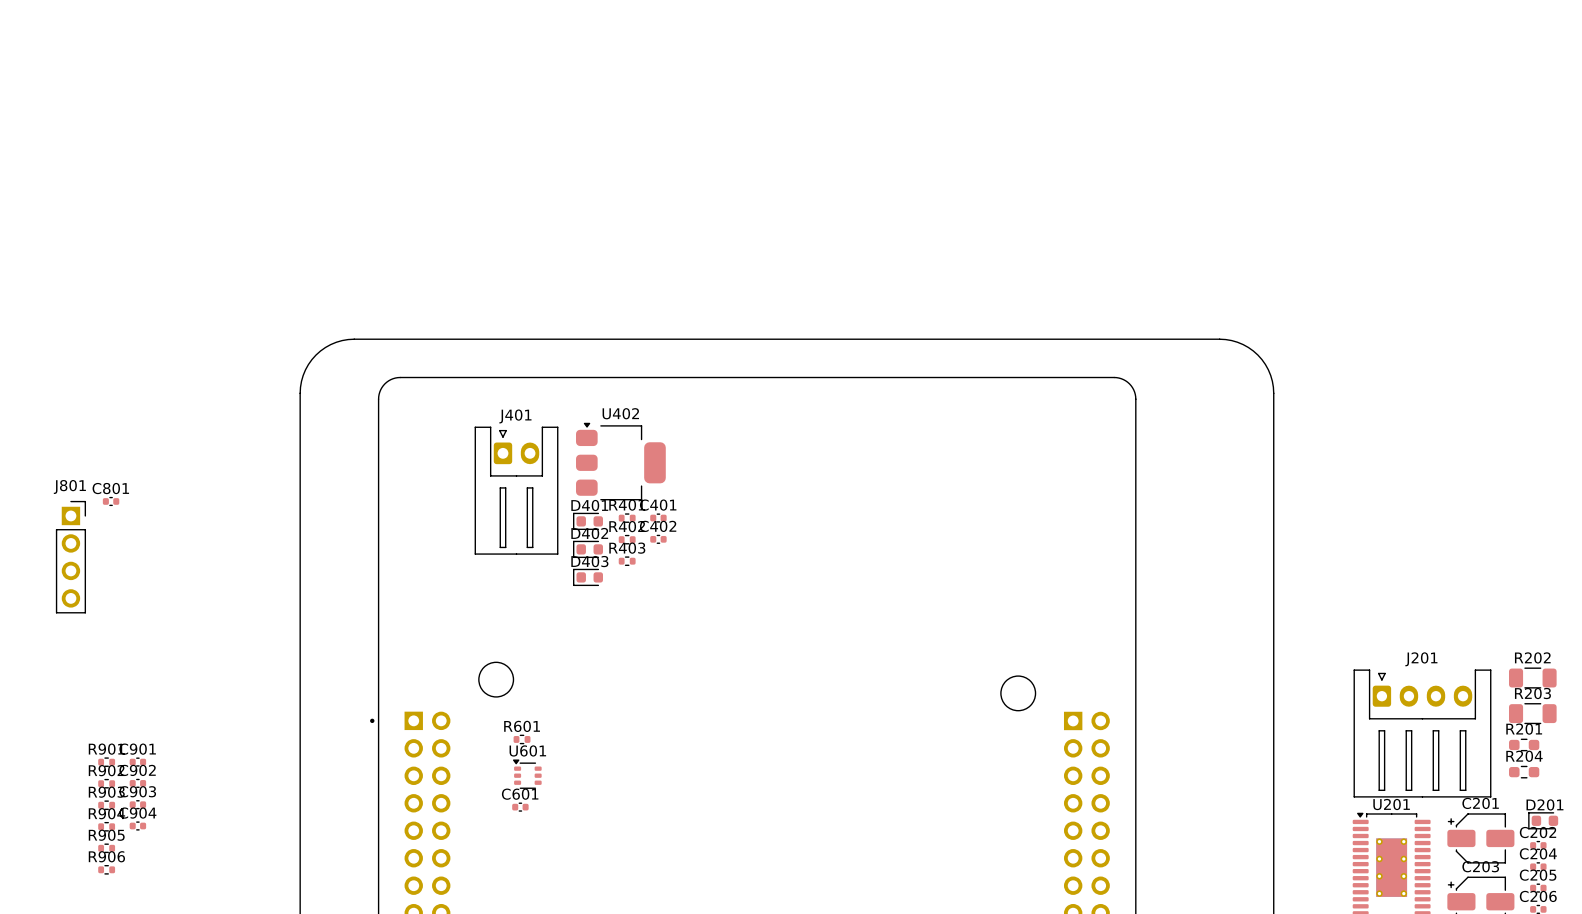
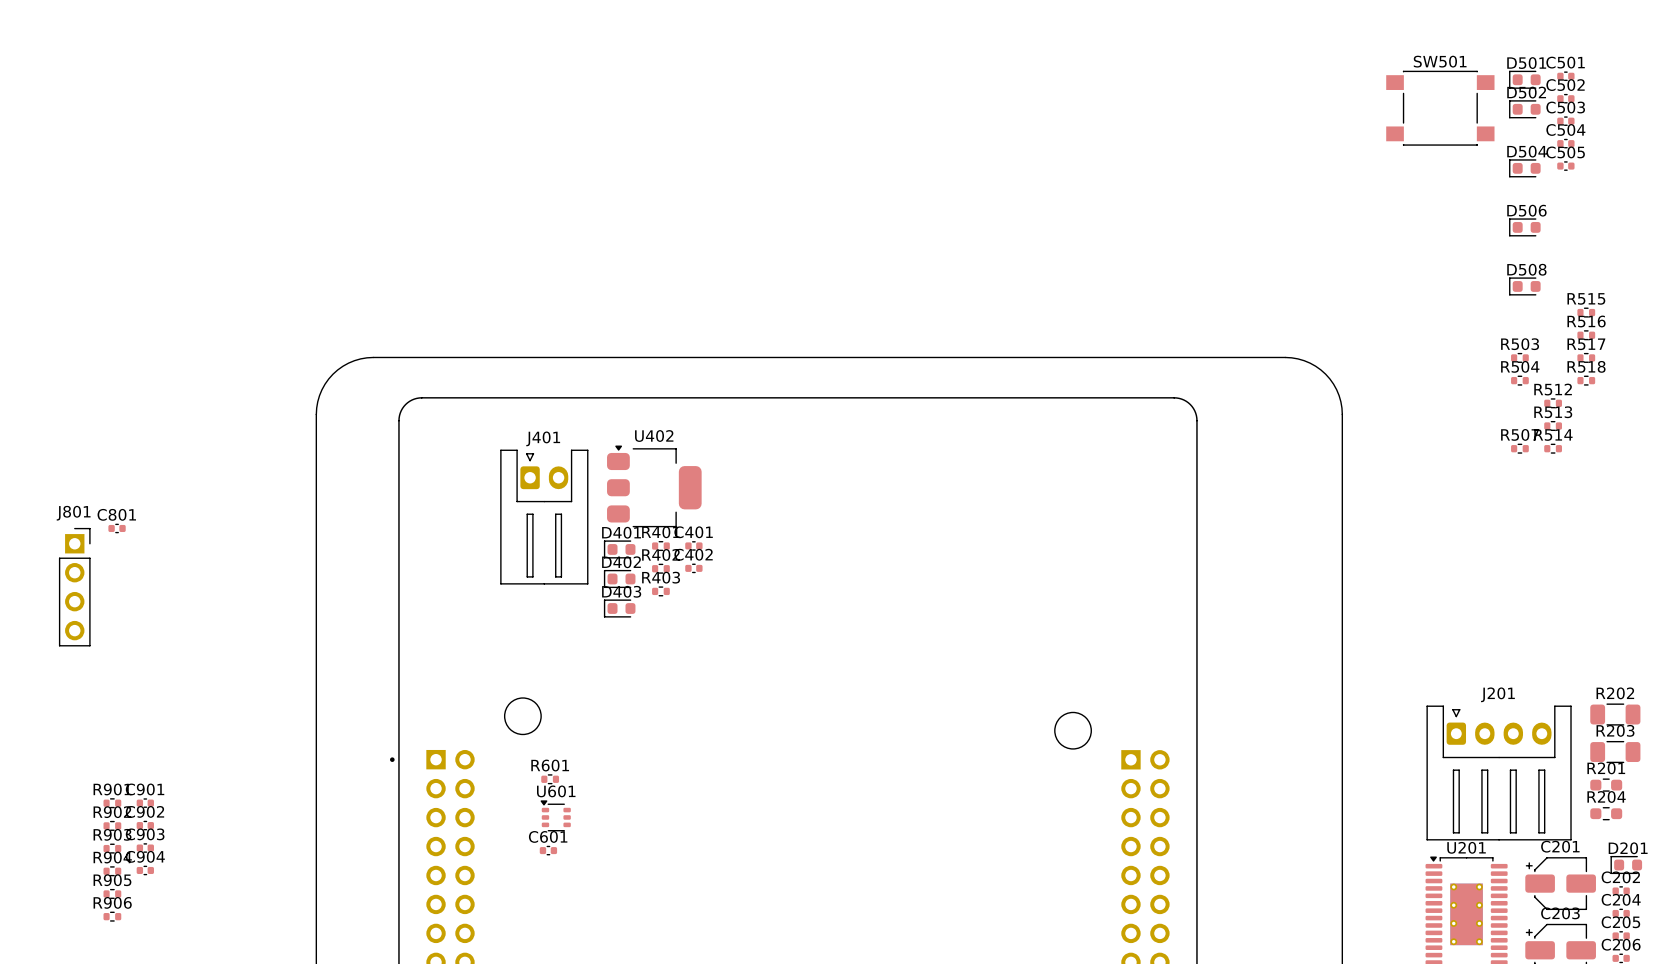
C501: none -> (1565, 76)
D501: none -> (1524, 79)
C502: none -> (1565, 98)
SW501: none -> (1440, 108)
D502: none -> (1524, 109)
C503: none -> (1565, 121)
C504: none -> (1565, 143)
C505: none -> (1565, 166)
D504: none -> (1524, 168)
D506: none -> (1524, 227)
D508: none -> (1524, 286)
R515: none -> (1586, 312)
R516: none -> (1586, 335)
R503: none -> (1519, 357)
R517: none -> (1586, 357)
R504: none -> (1519, 380)
R518: none -> (1586, 380)
R512: none -> (1553, 403)
R513: none -> (1553, 425)
R507: none -> (1519, 448)
R514: none -> (1553, 448)

